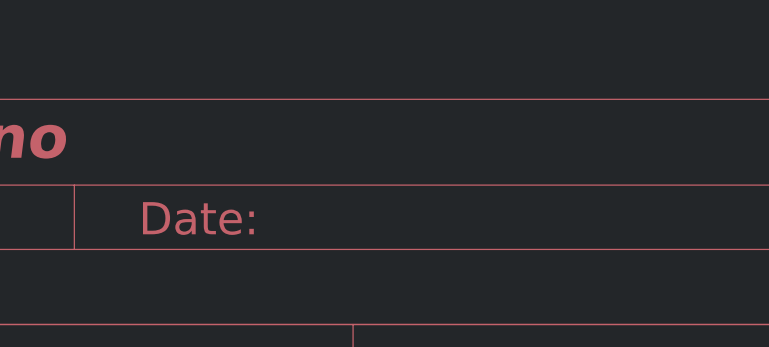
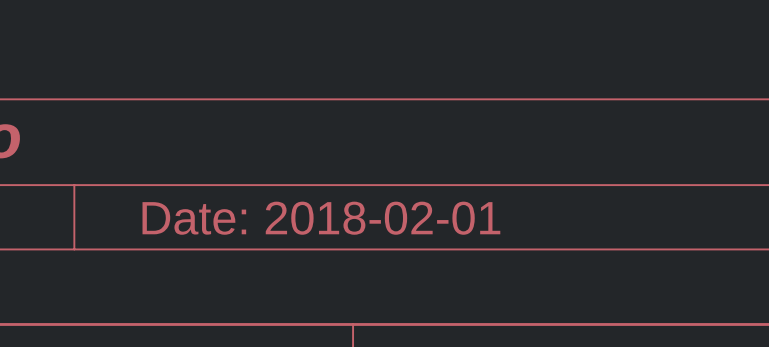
title block: Date: (198, 218) -> Date: 2018-02-01 (321, 218)

